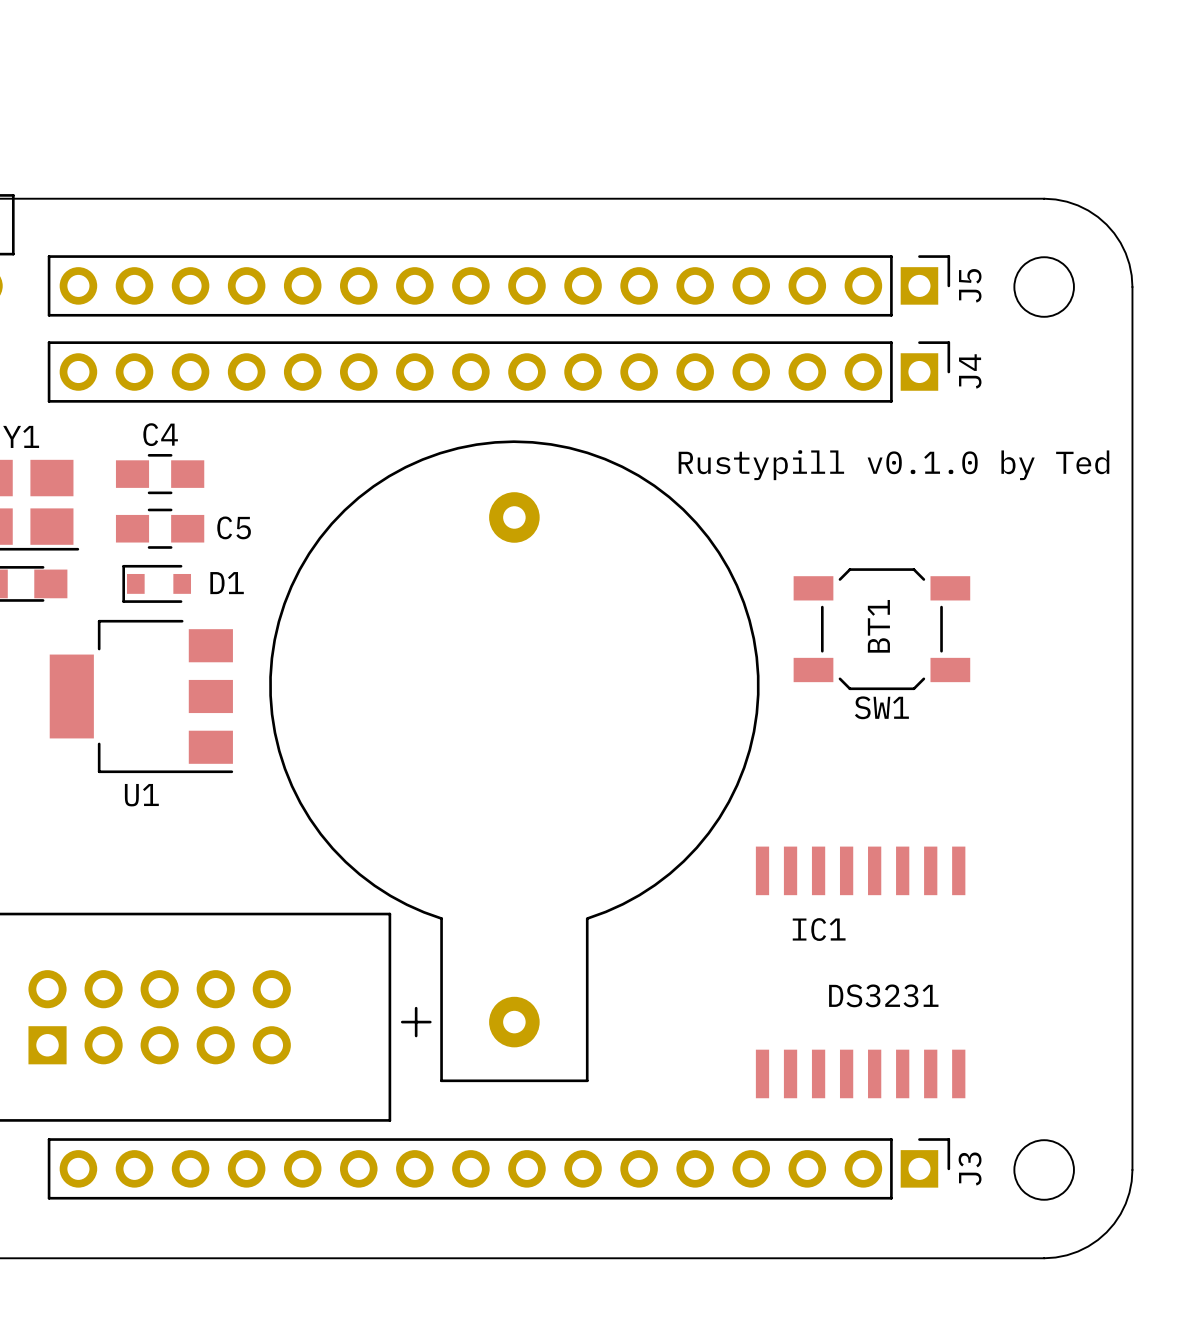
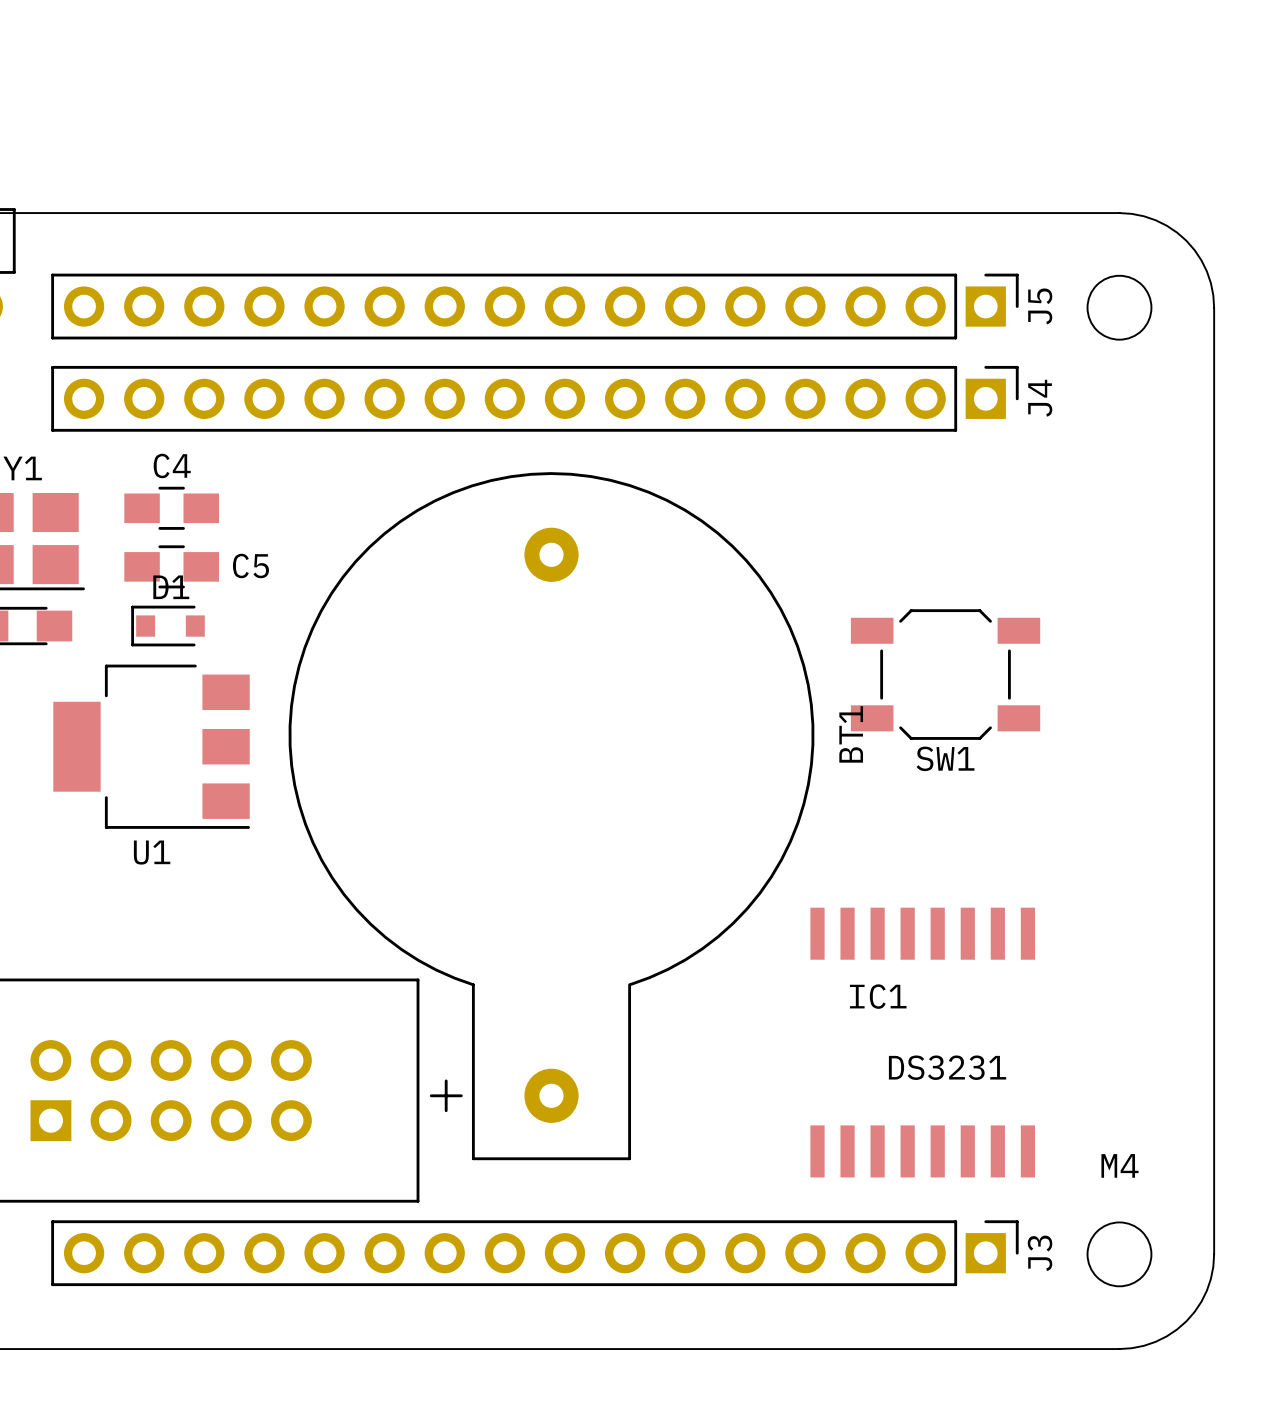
text: Rustypill v0.1.0 by Ted (893, 465) -> none
D1 name position: D1 (227, 583) -> D1 (171, 587)
BT1 name position: BT1 (878, 626) -> BT1 (851, 734)
M4 name: none -> M4 (1119, 1165)

